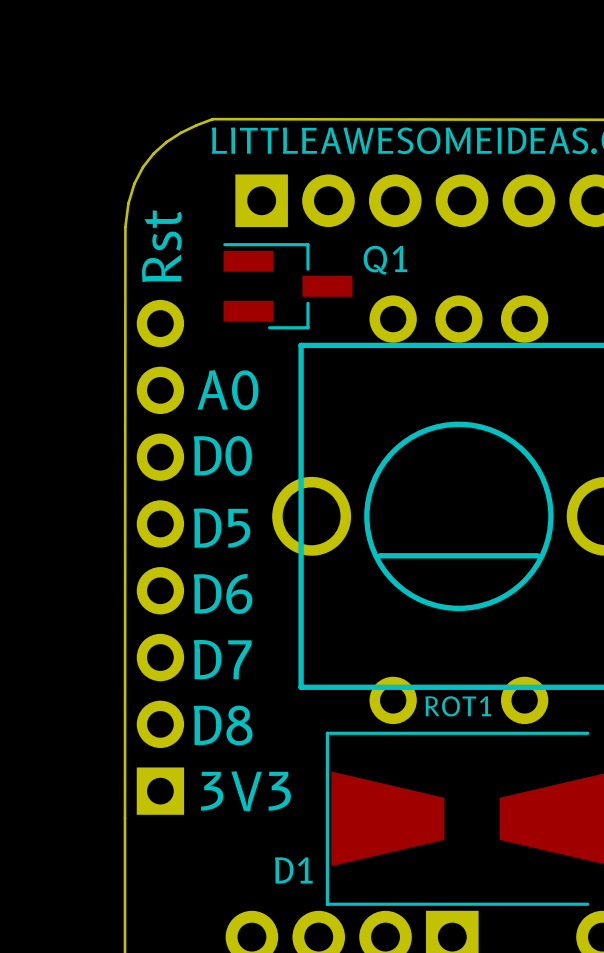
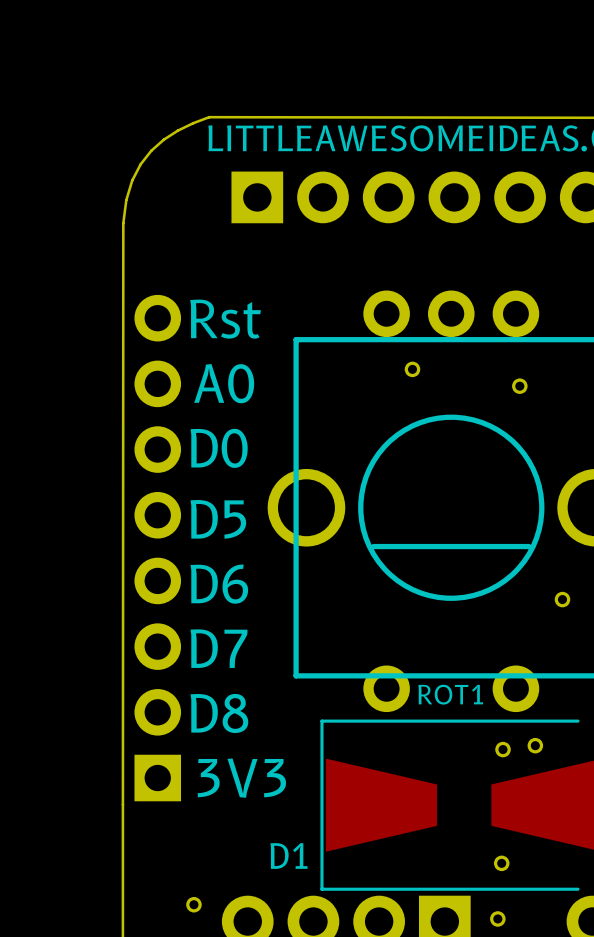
text rotation: 0° (161, 246) -> 90° clockwise (225, 319)
text position: Rst (161, 246) -> Rst (225, 319)
Q1: (287, 286) -> none
part: none -> (412, 369)
part: none -> (519, 386)
part: none -> (562, 599)
part: none -> (535, 745)
part: none -> (503, 749)
part: none -> (501, 863)
part: none -> (193, 904)
part: none -> (497, 918)

